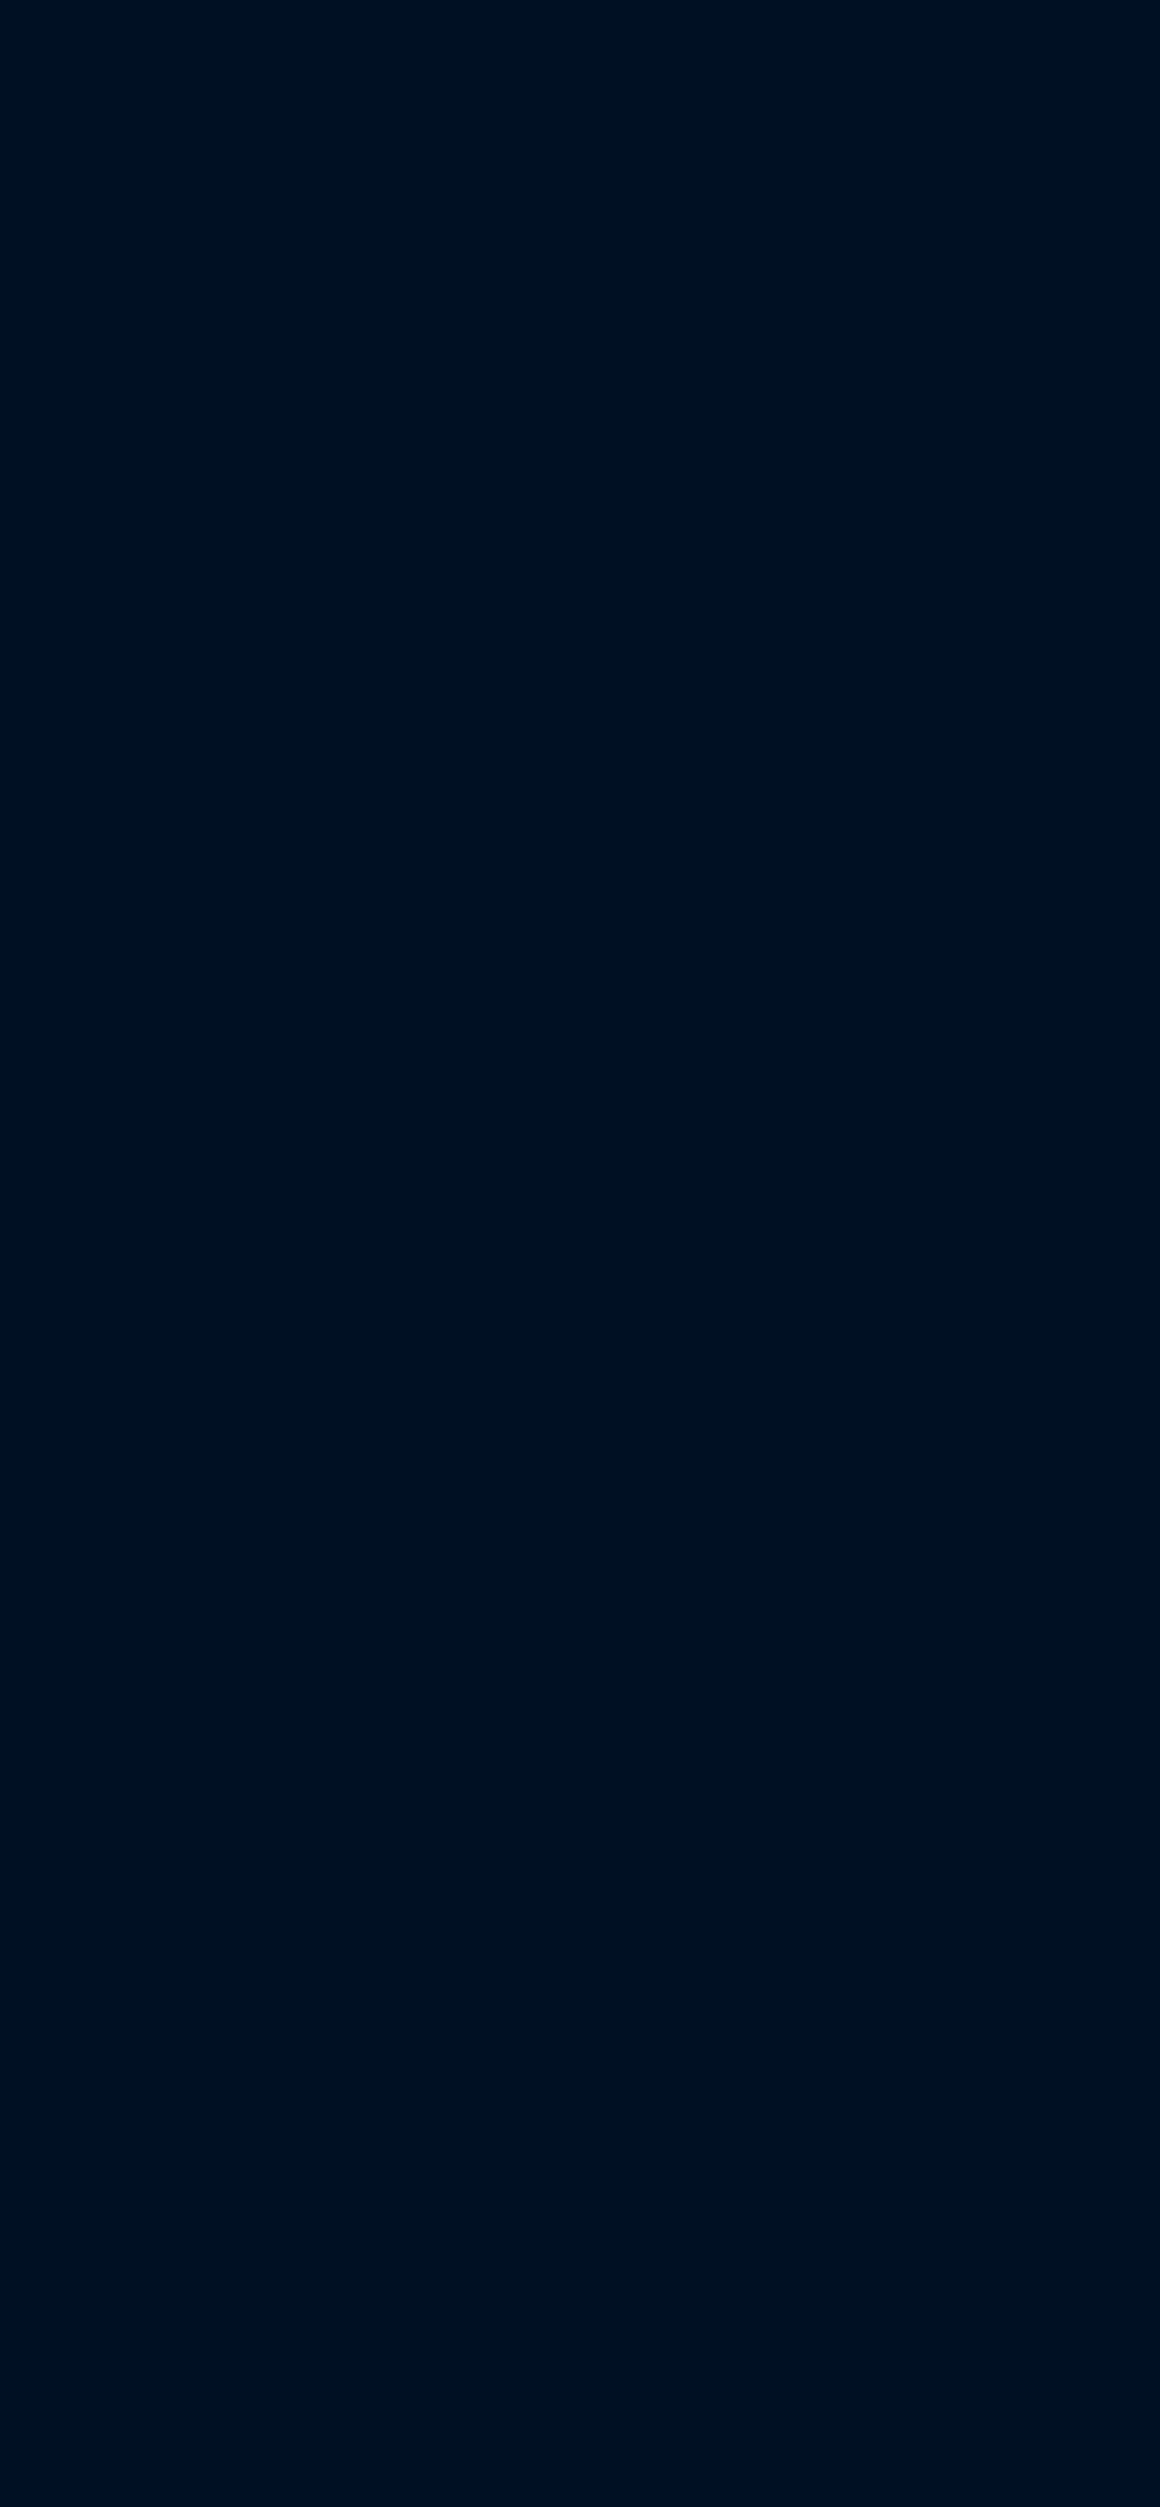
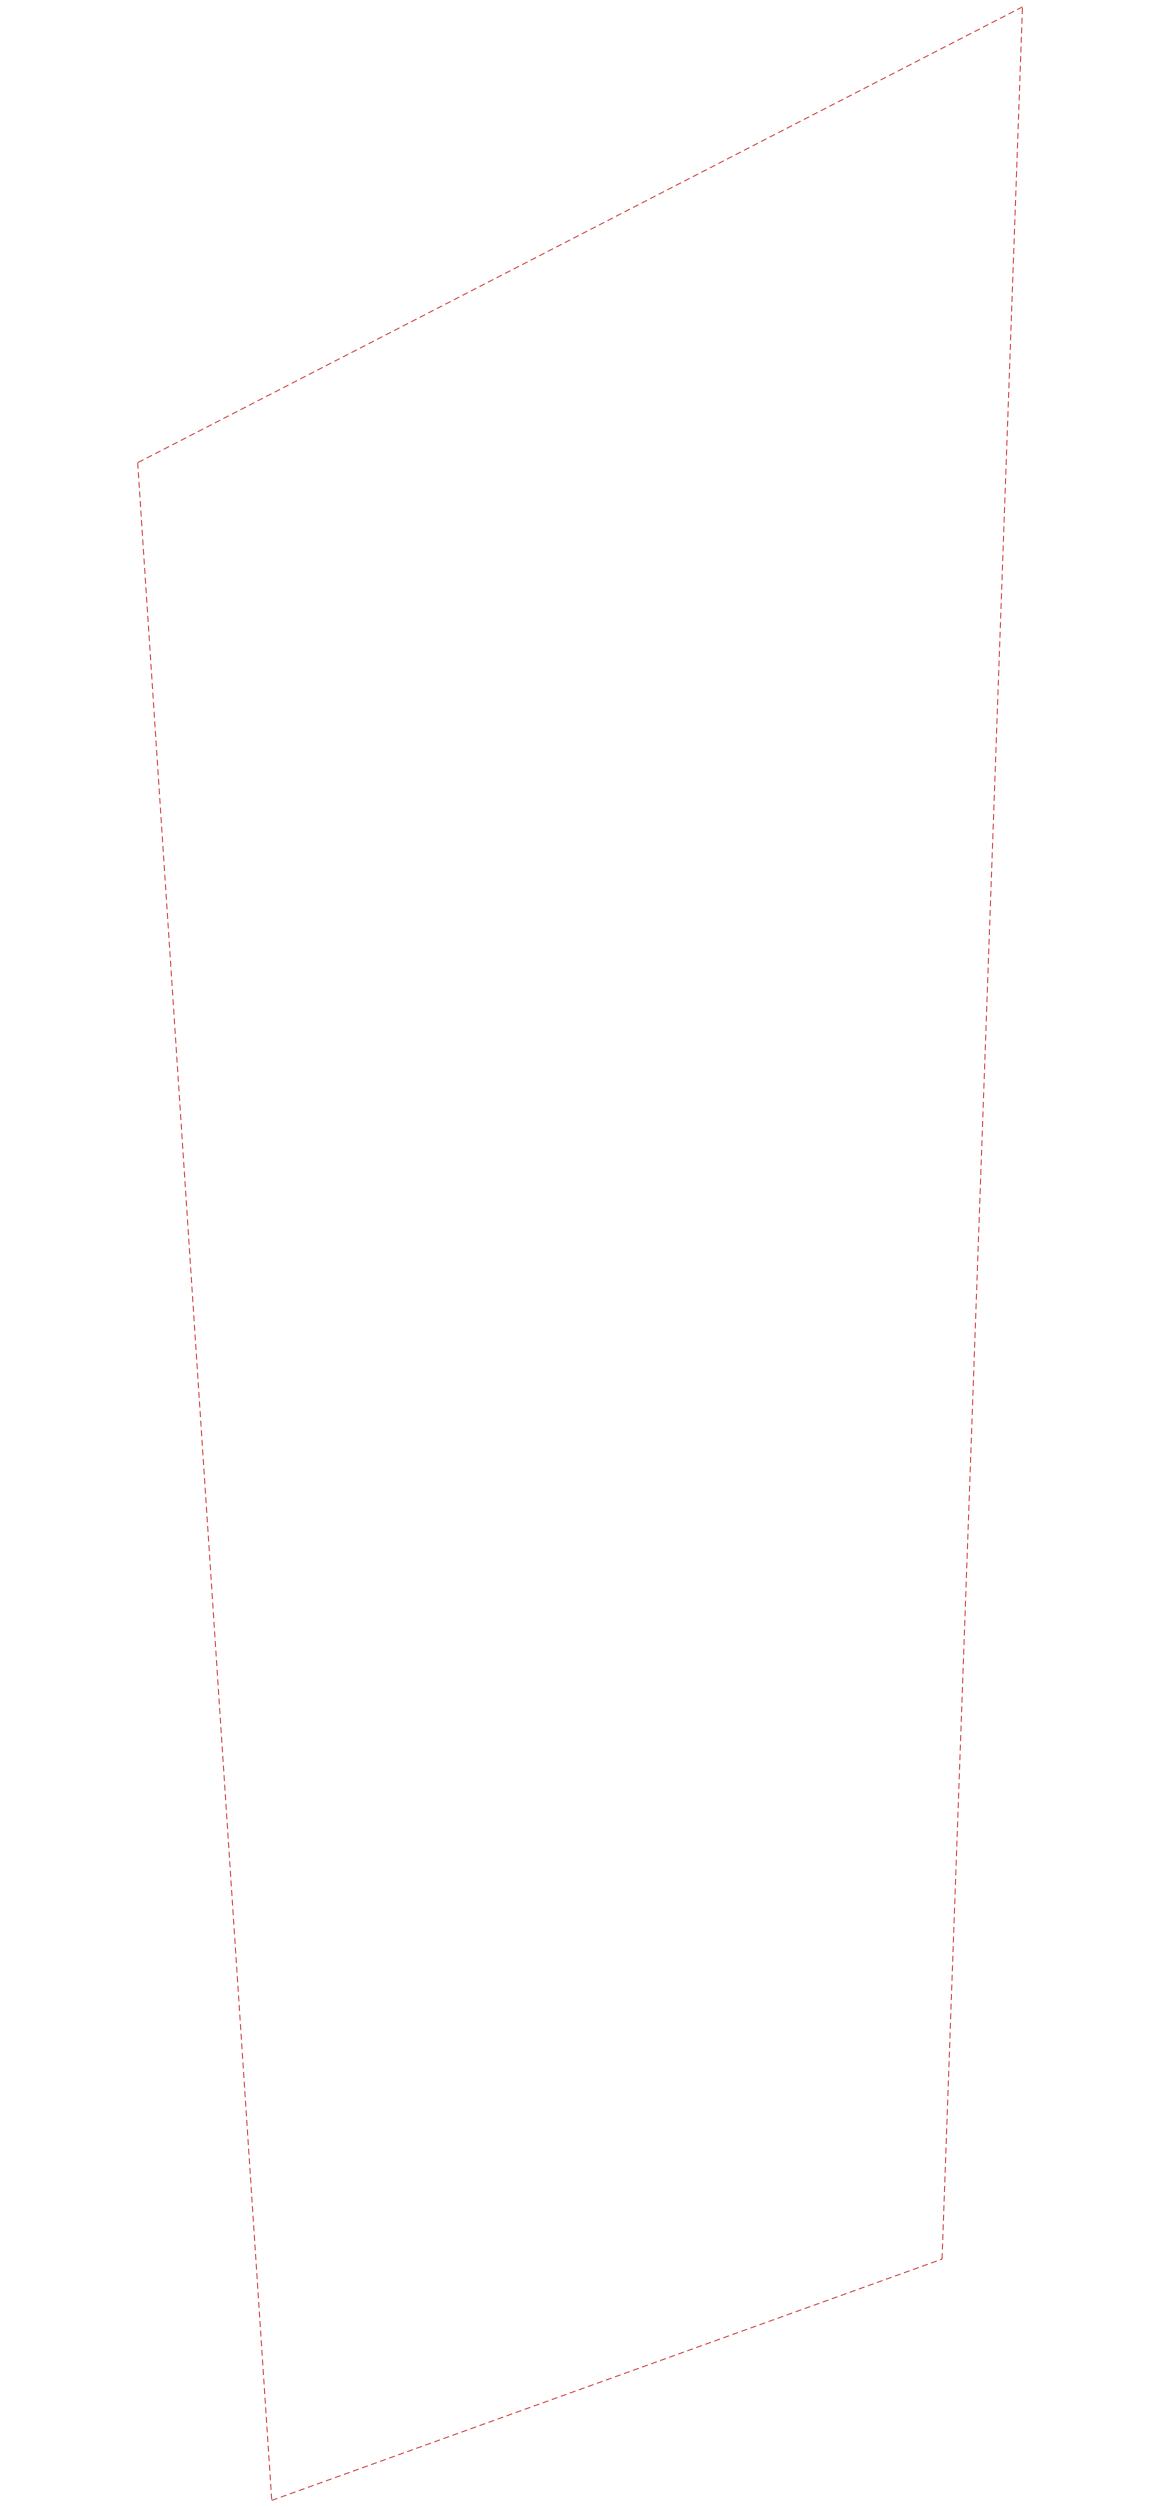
zone outline: none -> (1022, 6) (137, 462) (271, 2500) (942, 2259) (1022, 6)

